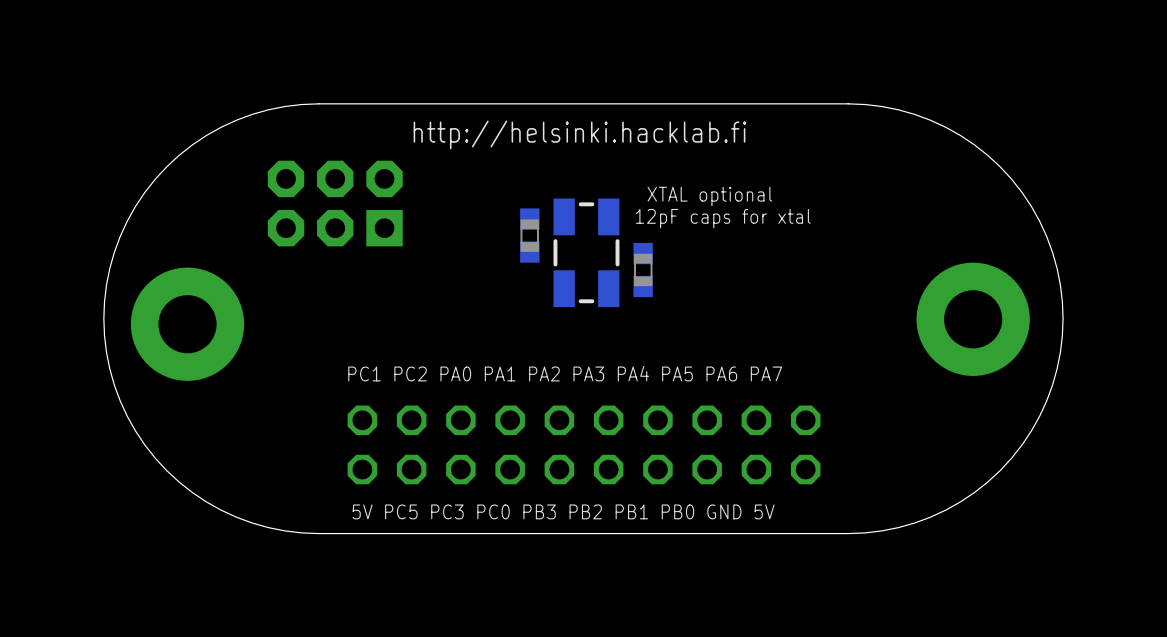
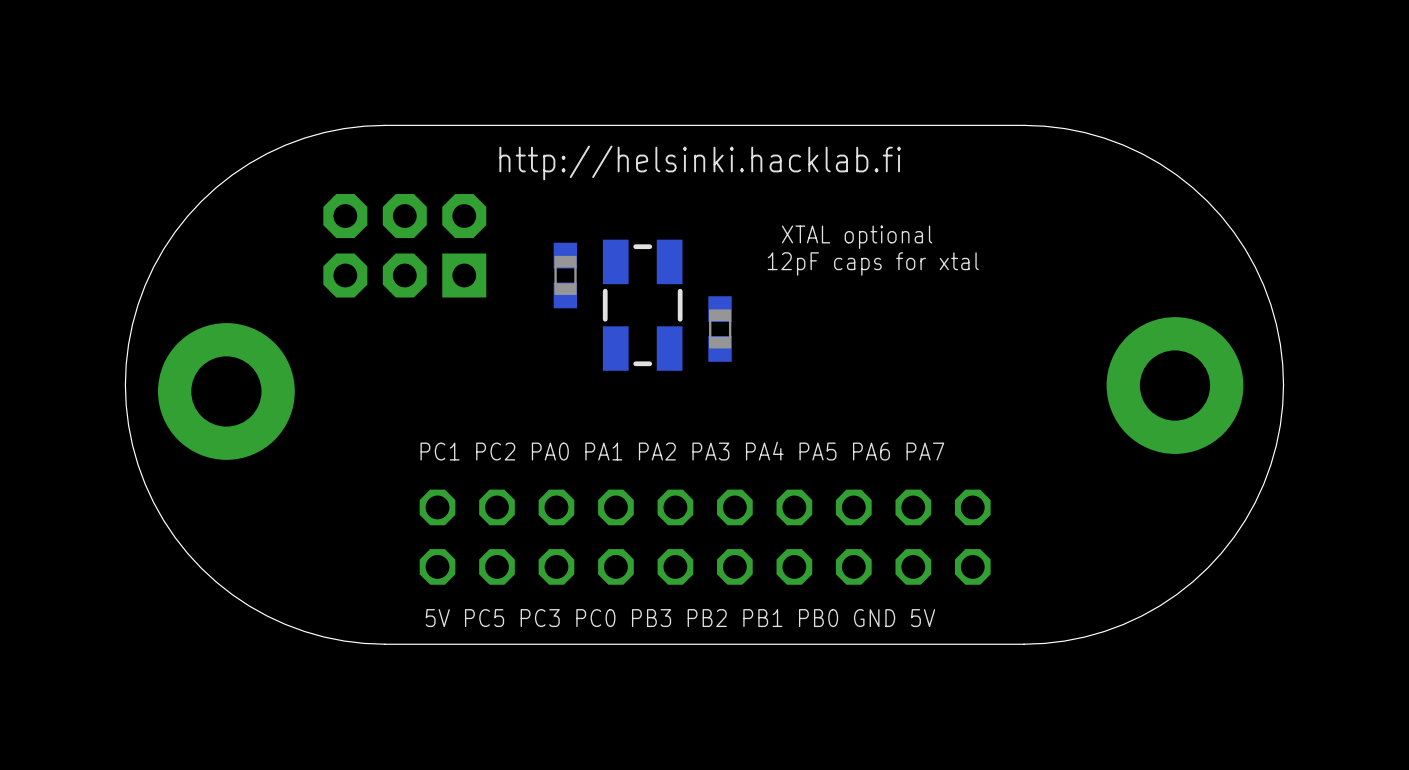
part footprint: [520, 208, 540, 263] -> [602, 239, 683, 371]
part: none -> (565, 275)
part: (586, 252) -> none
part position: (643, 270) -> (720, 329)

